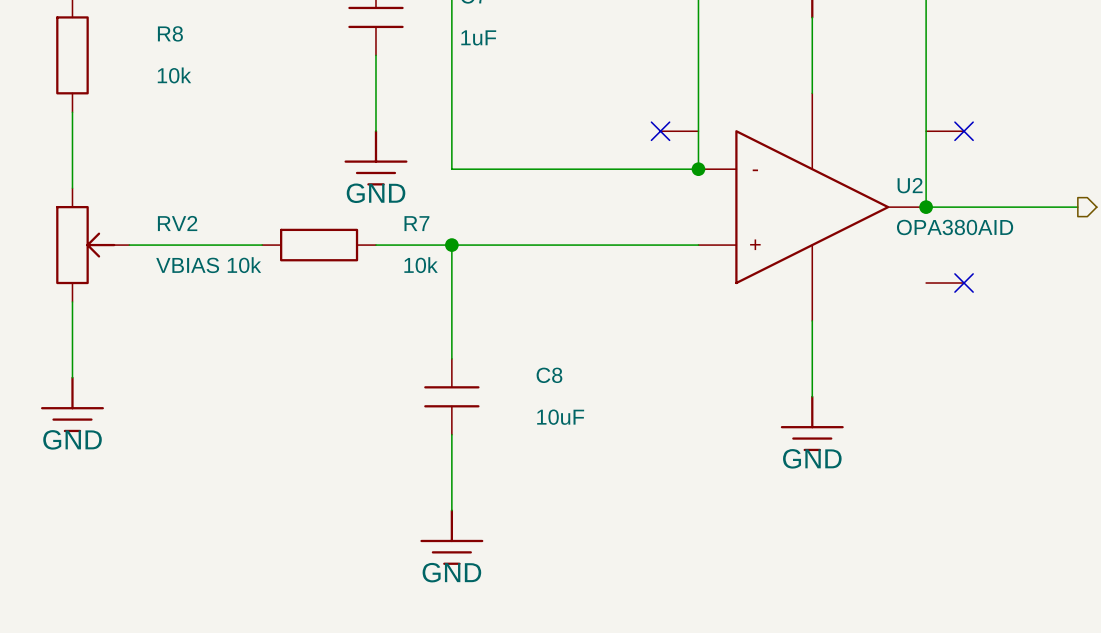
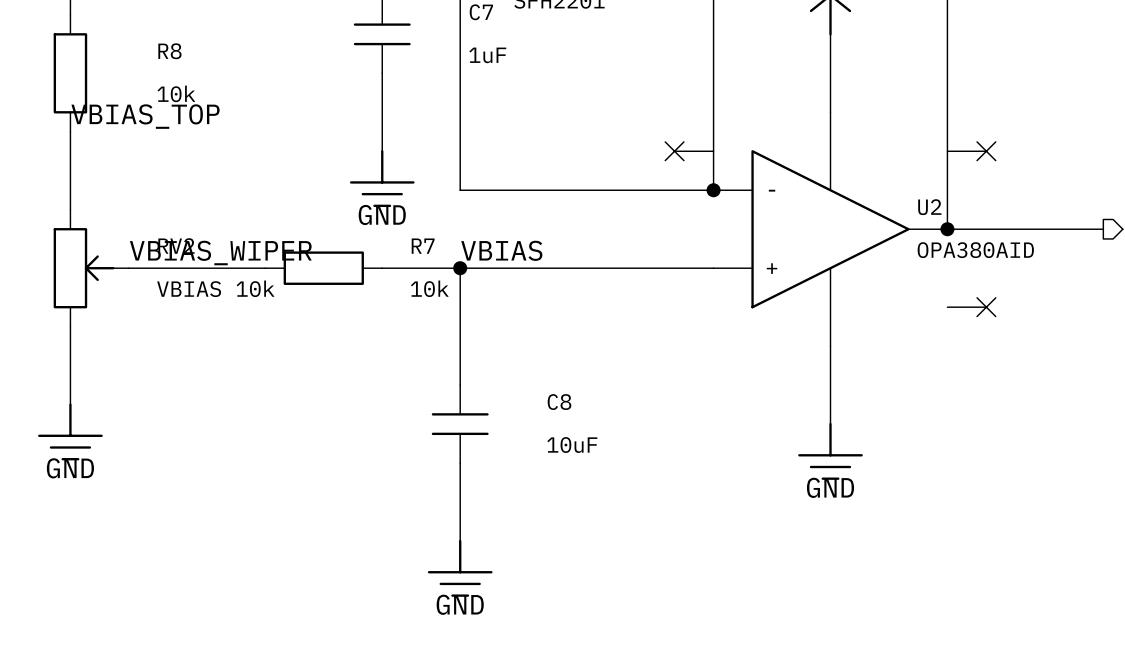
label: none -> VBIAS_TOP (145, 116)
label: none -> VBIAS (501, 250)
label: none -> VBIAS_WIPER (220, 253)

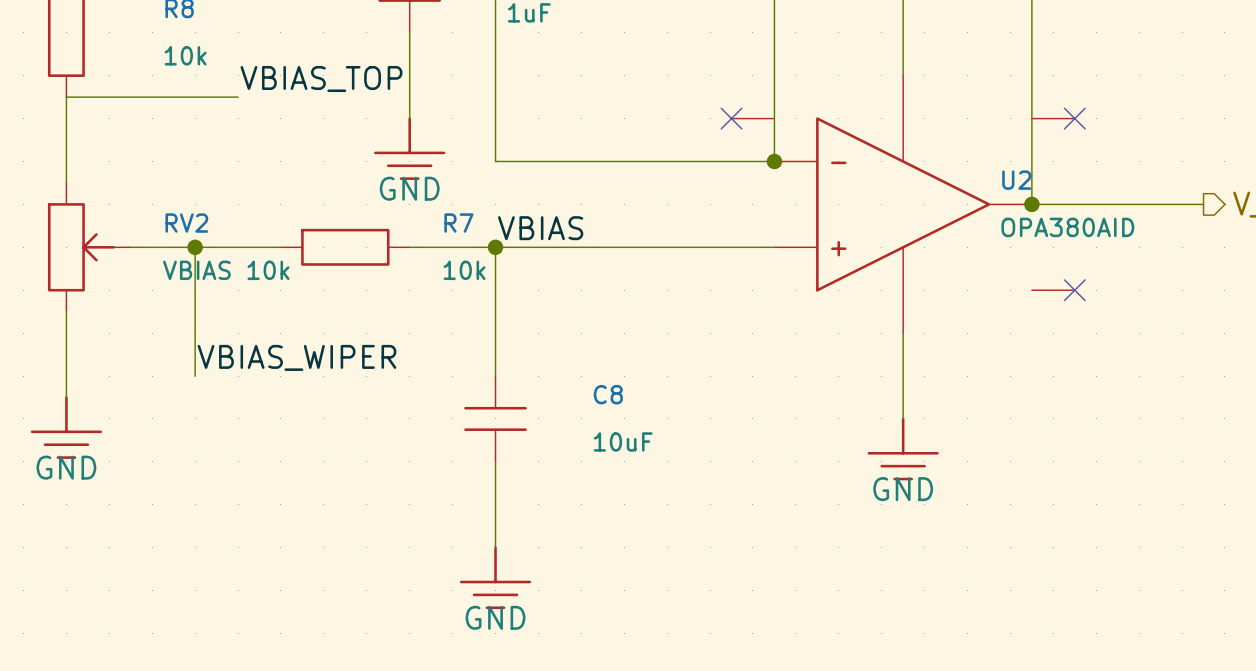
label position: VBIAS_TOP (145, 116) -> VBIAS_TOP (321, 79)
wire: none -> (66, 97) (238, 97)
label position: VBIAS_WIPER (220, 253) -> VBIAS_WIPER (296, 357)
wire: none -> (195, 247) (195, 376)
junction: none -> (195, 247)

